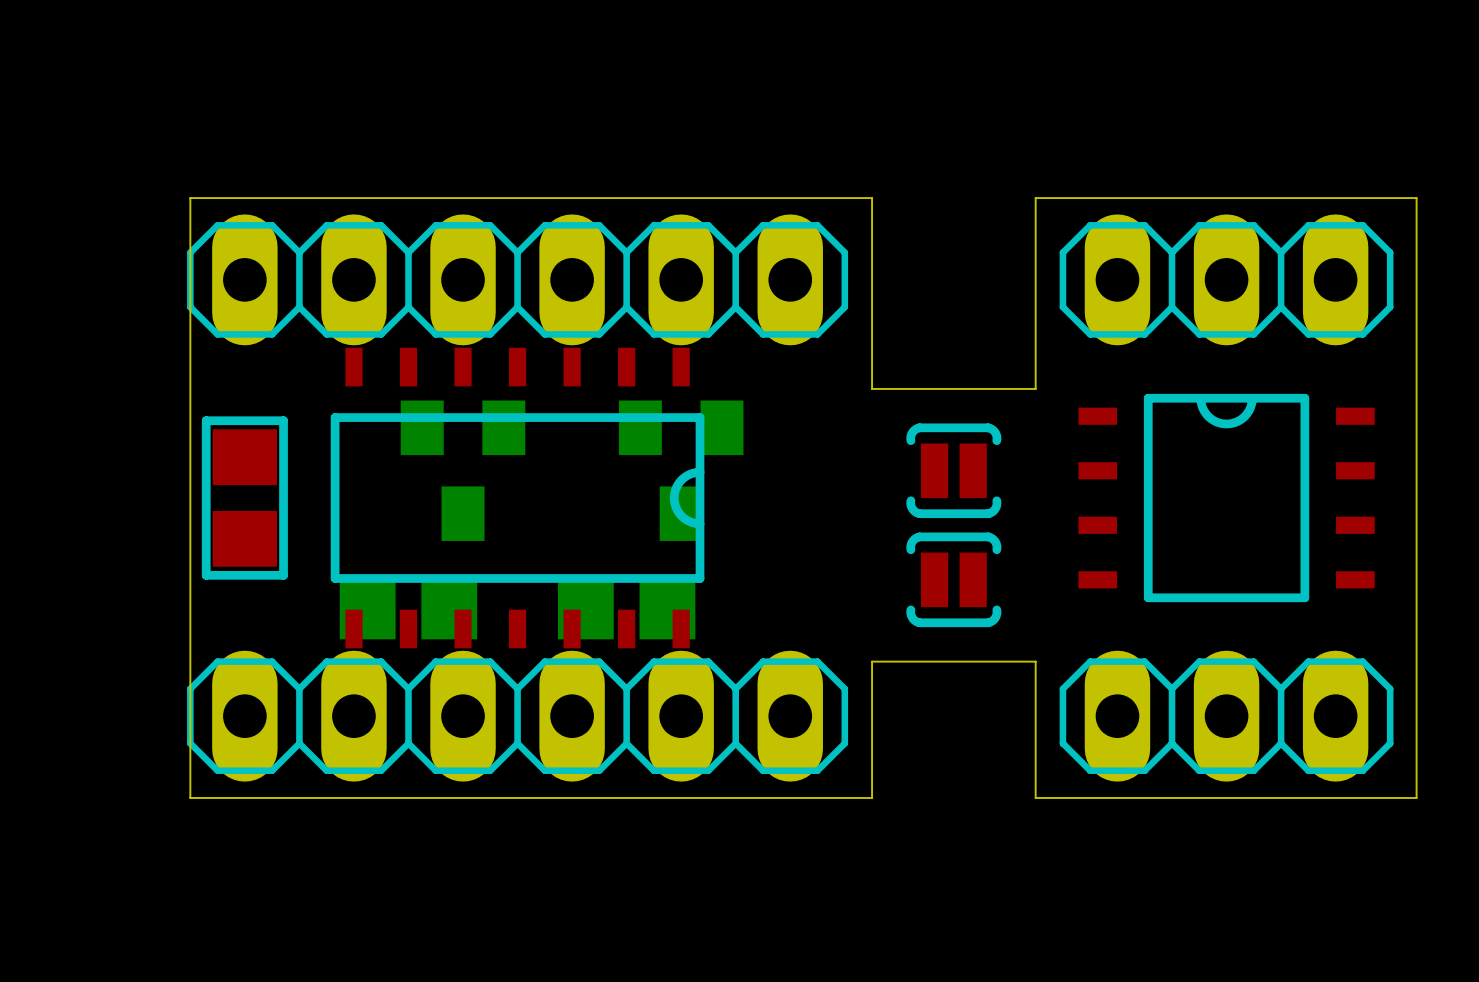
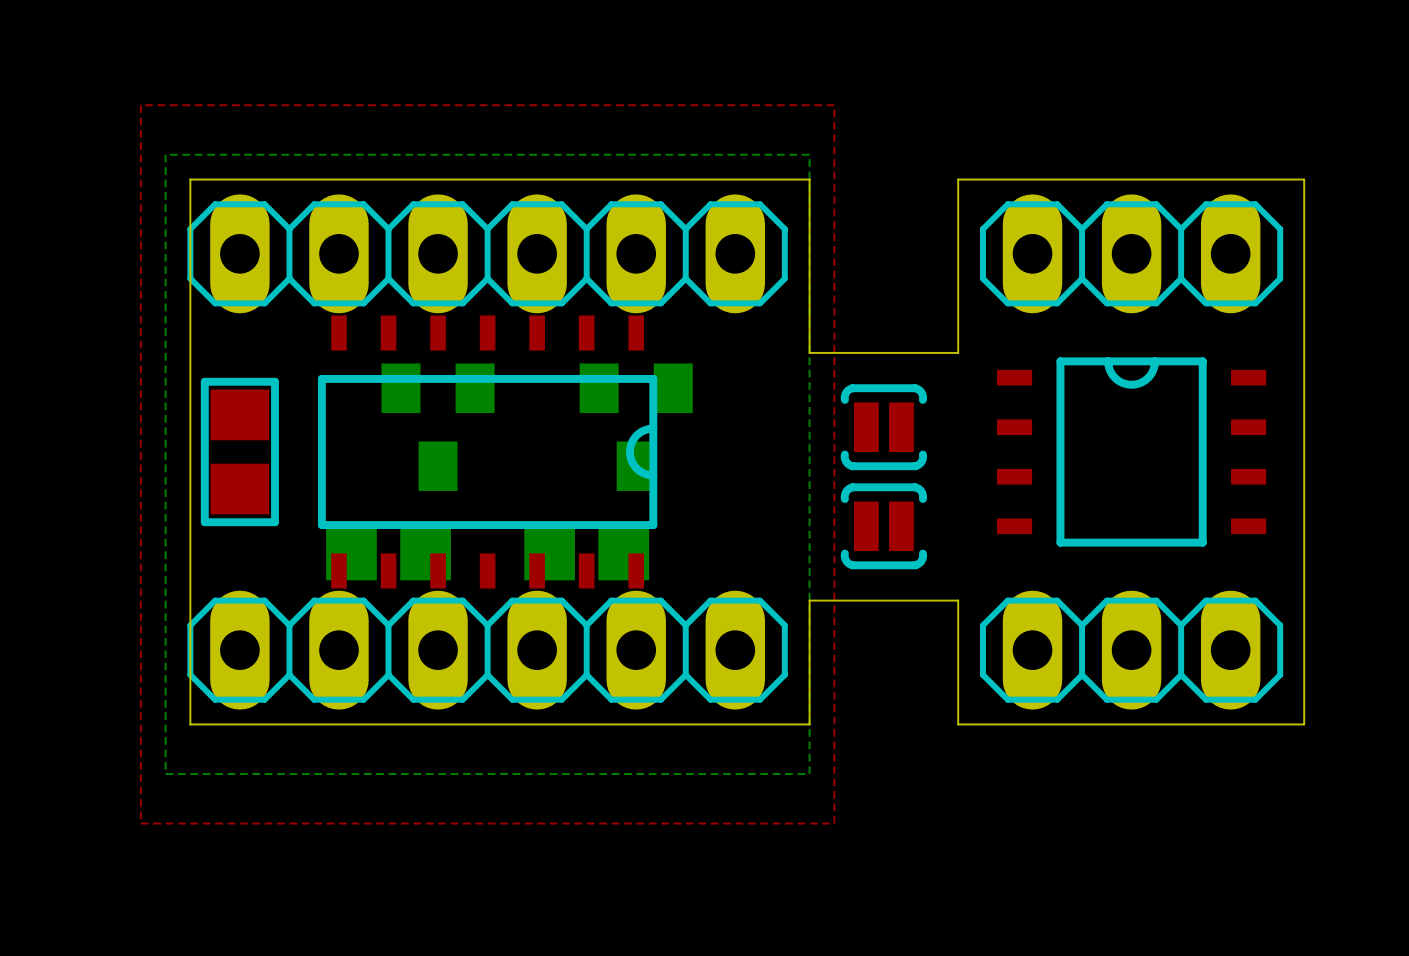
top zone outline: none -> (140, 105) (140, 823) (834, 823) (834, 105) (140, 105)
bottom zone outline: none -> (165, 154) (165, 773) (809, 773) (809, 154) (165, 154)

